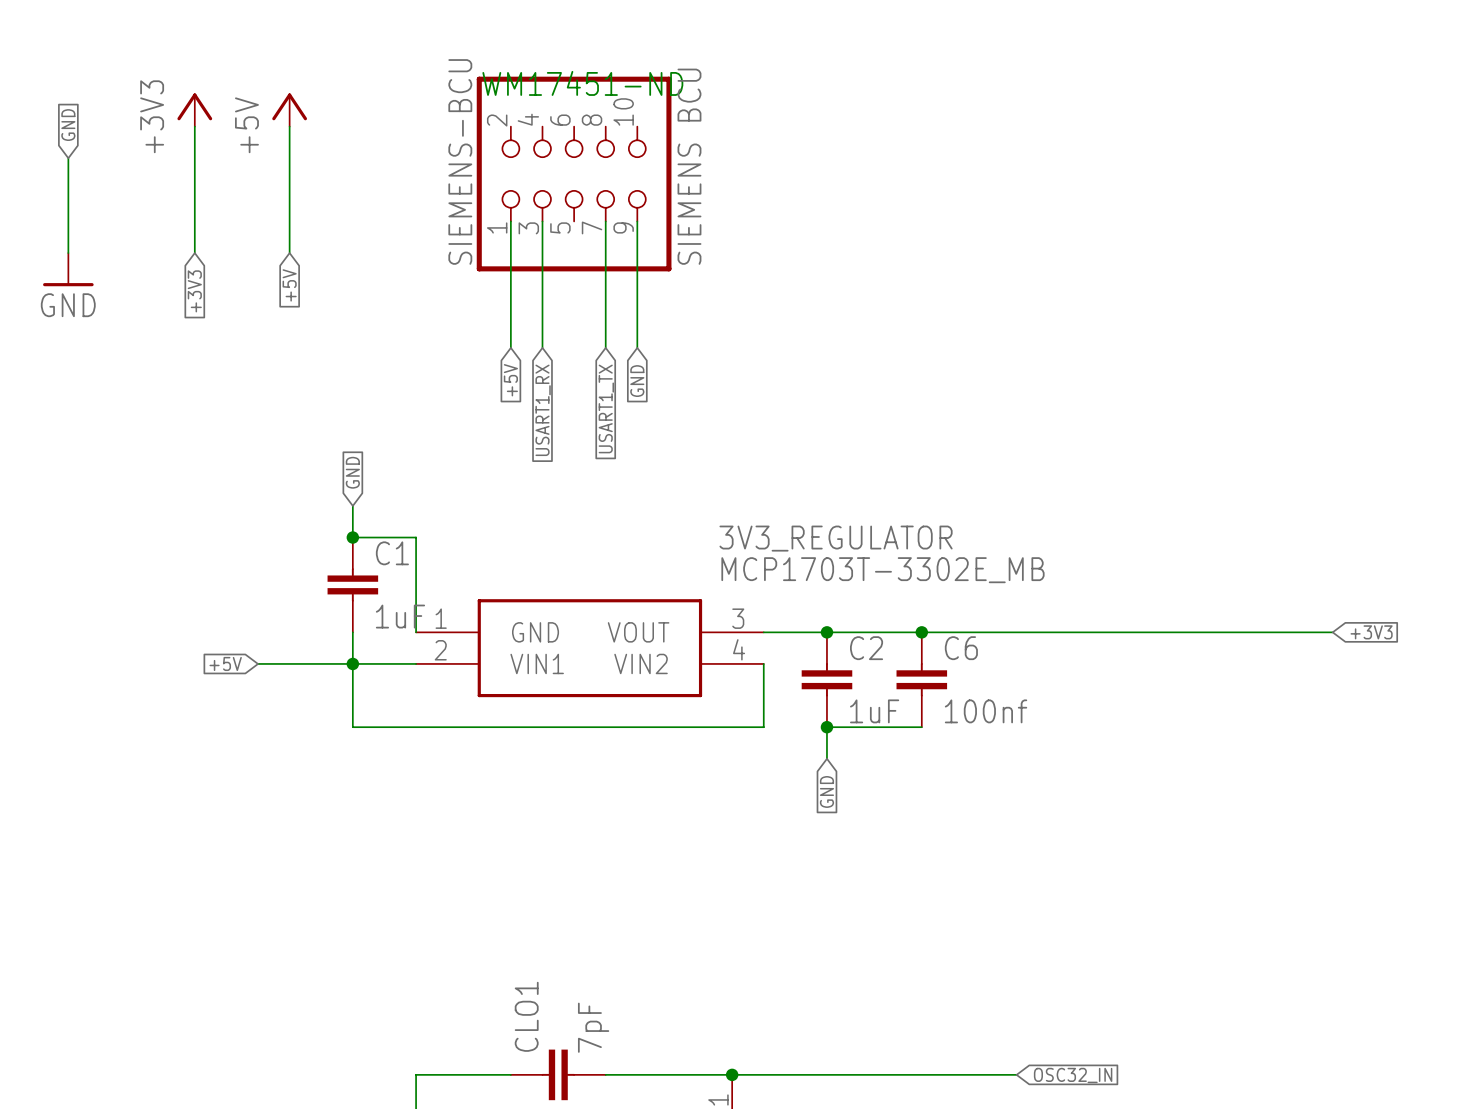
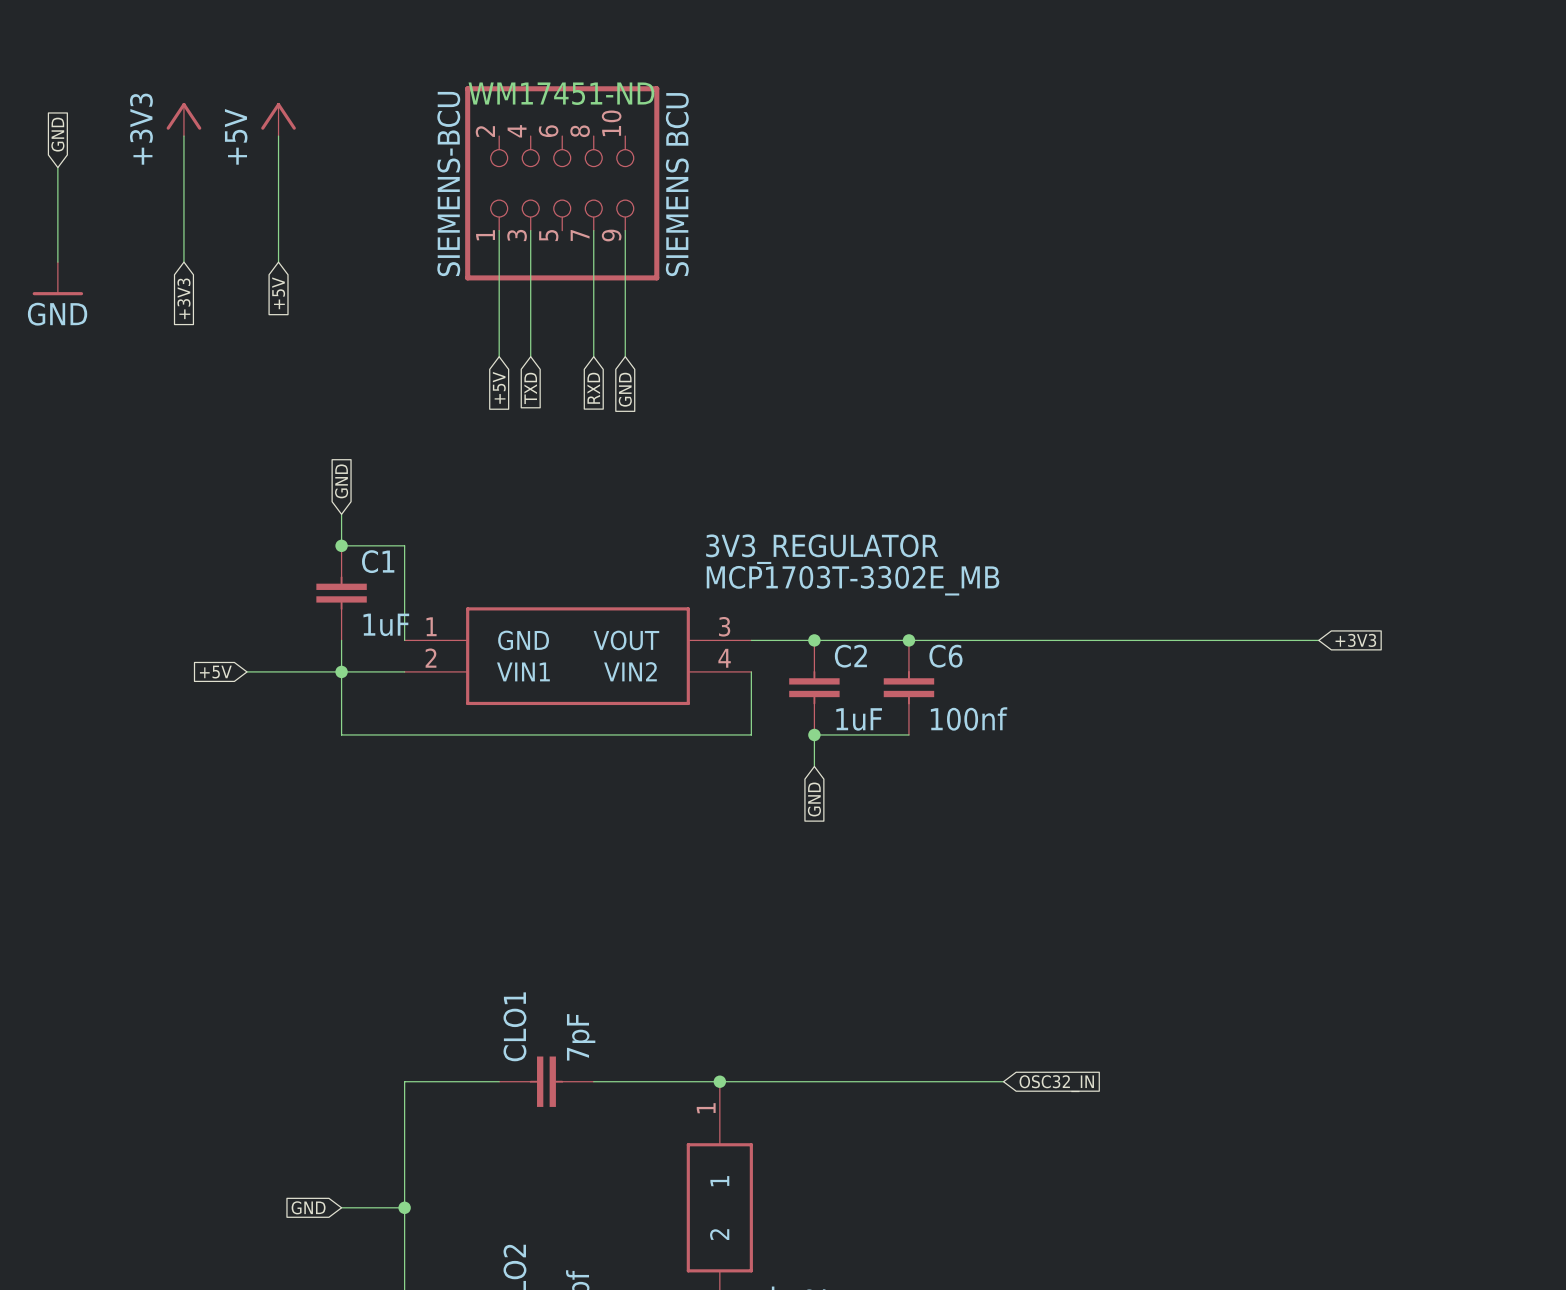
global label: USART1_TX (606, 408) -> RXD (593, 388)
global label: USART1_RX (543, 410) -> TXD (530, 388)

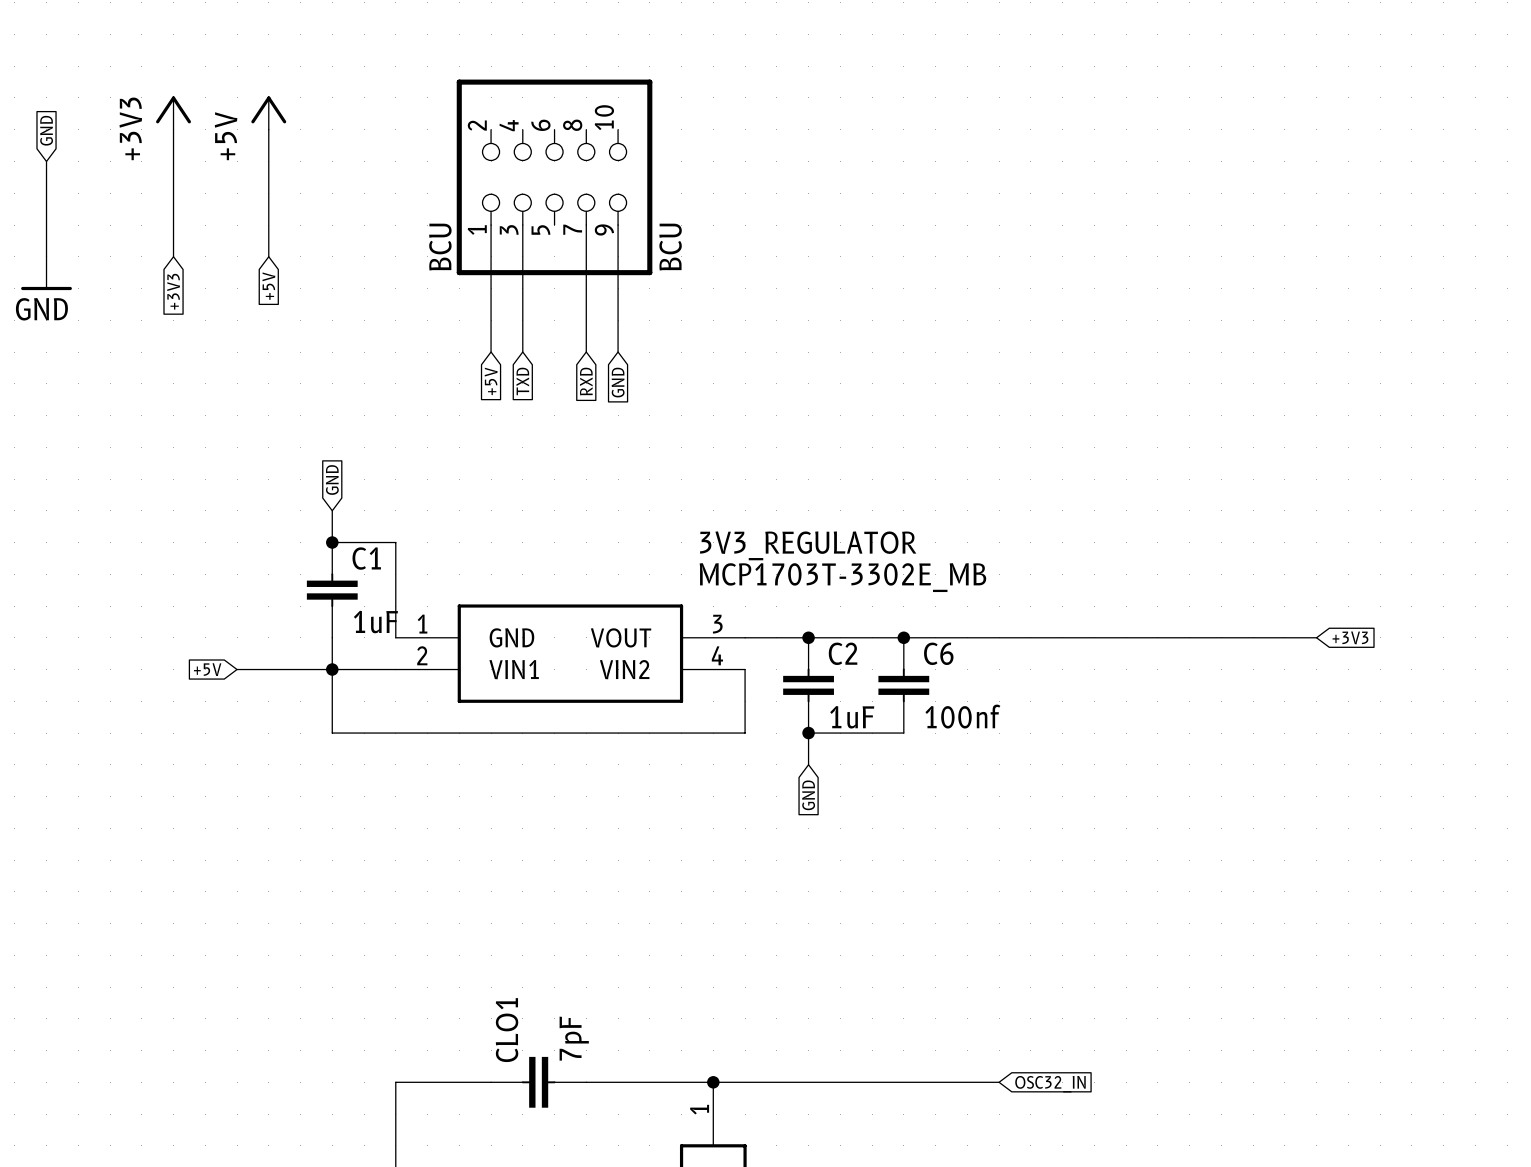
text: WM17451-ND (561, 93) -> none
SIEMENS-BCU name: SIEMENS-BCU (448, 184) -> BCU (440, 247)
SIEMENS-BCU value: SIEMENS BCU (677, 184) -> BCU (670, 247)

